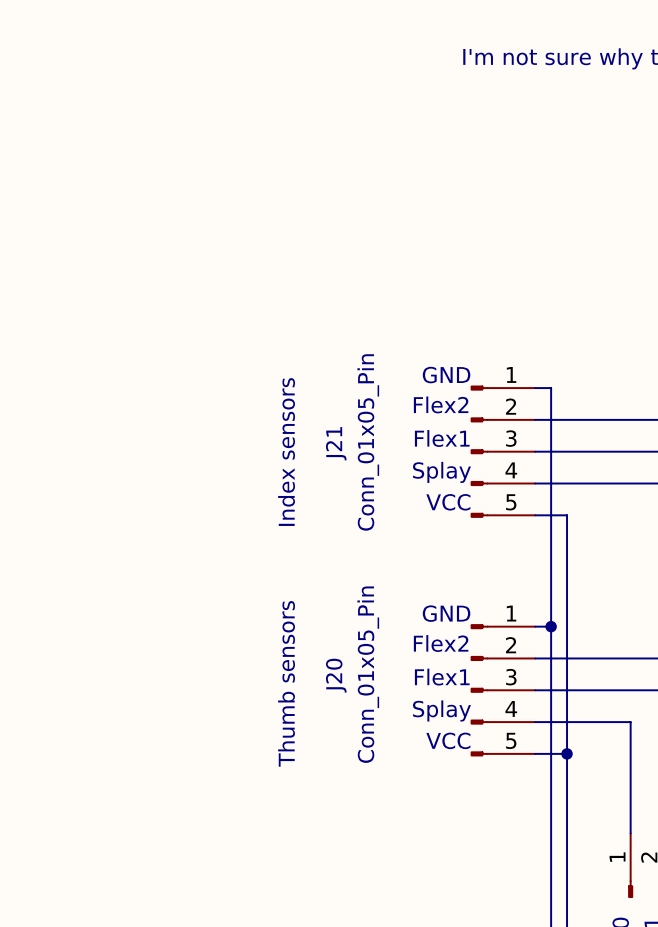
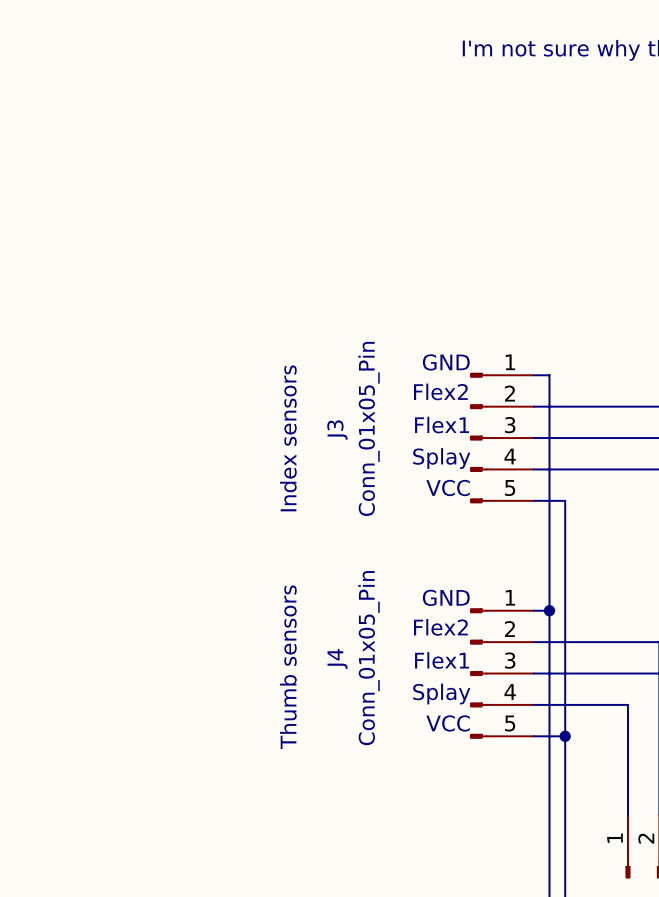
J21 name: J21 (336, 443) -> J3 (337, 430)
J20 name: J20 (336, 675) -> J4 (337, 658)

